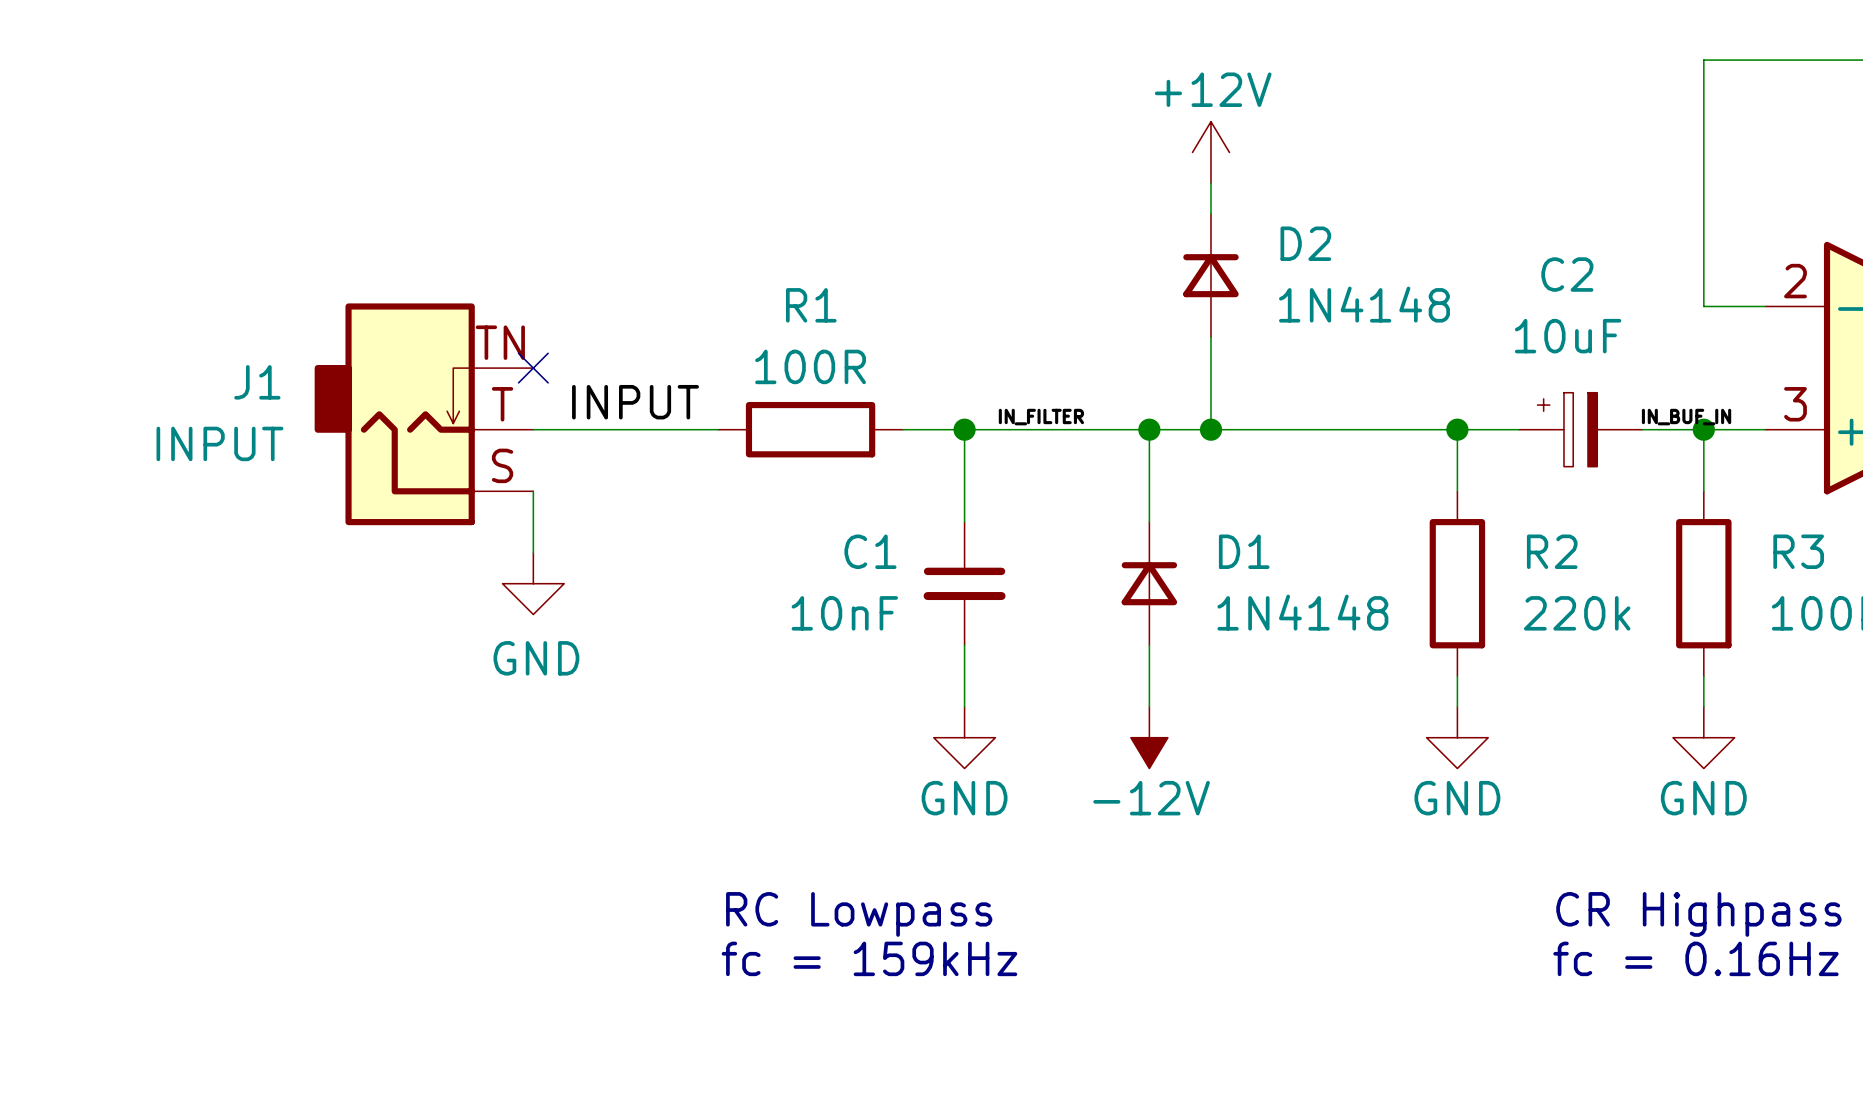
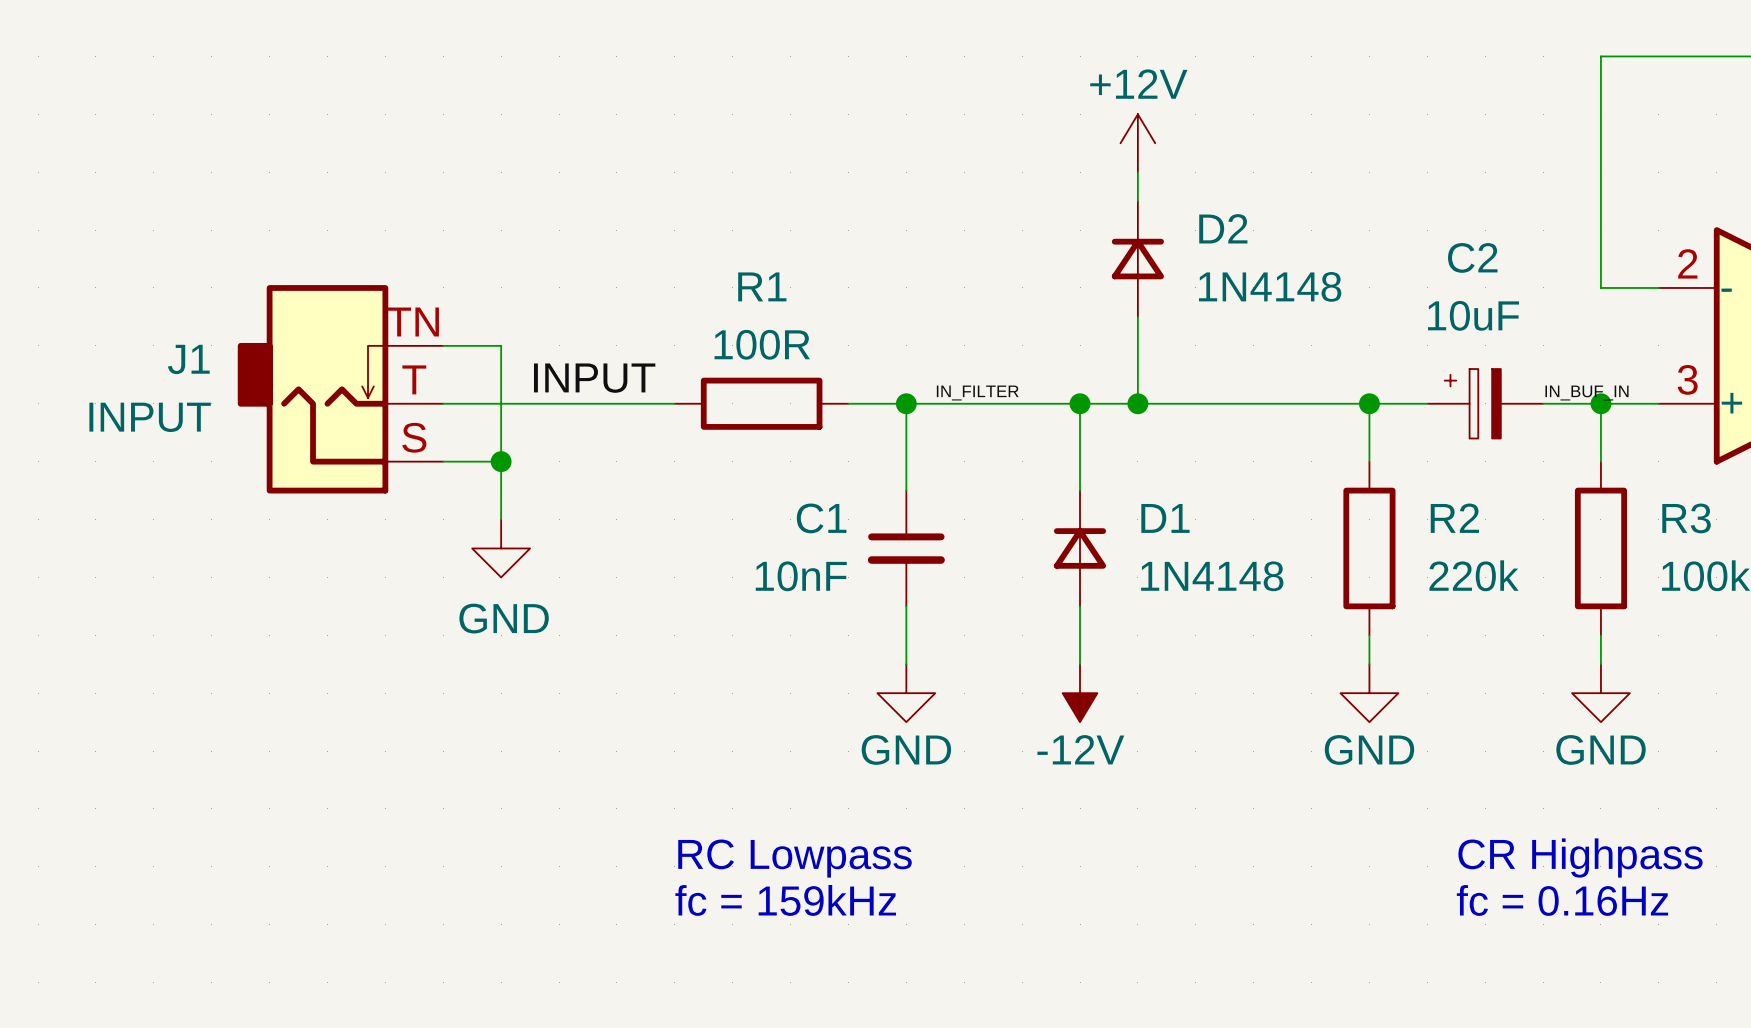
wire: none -> (443, 345) (501, 345) (501, 461) (443, 461)
no-connect mark: (533, 368) -> none
J1 position: (423, 414) -> (340, 389)
junction: none -> (501, 461)

